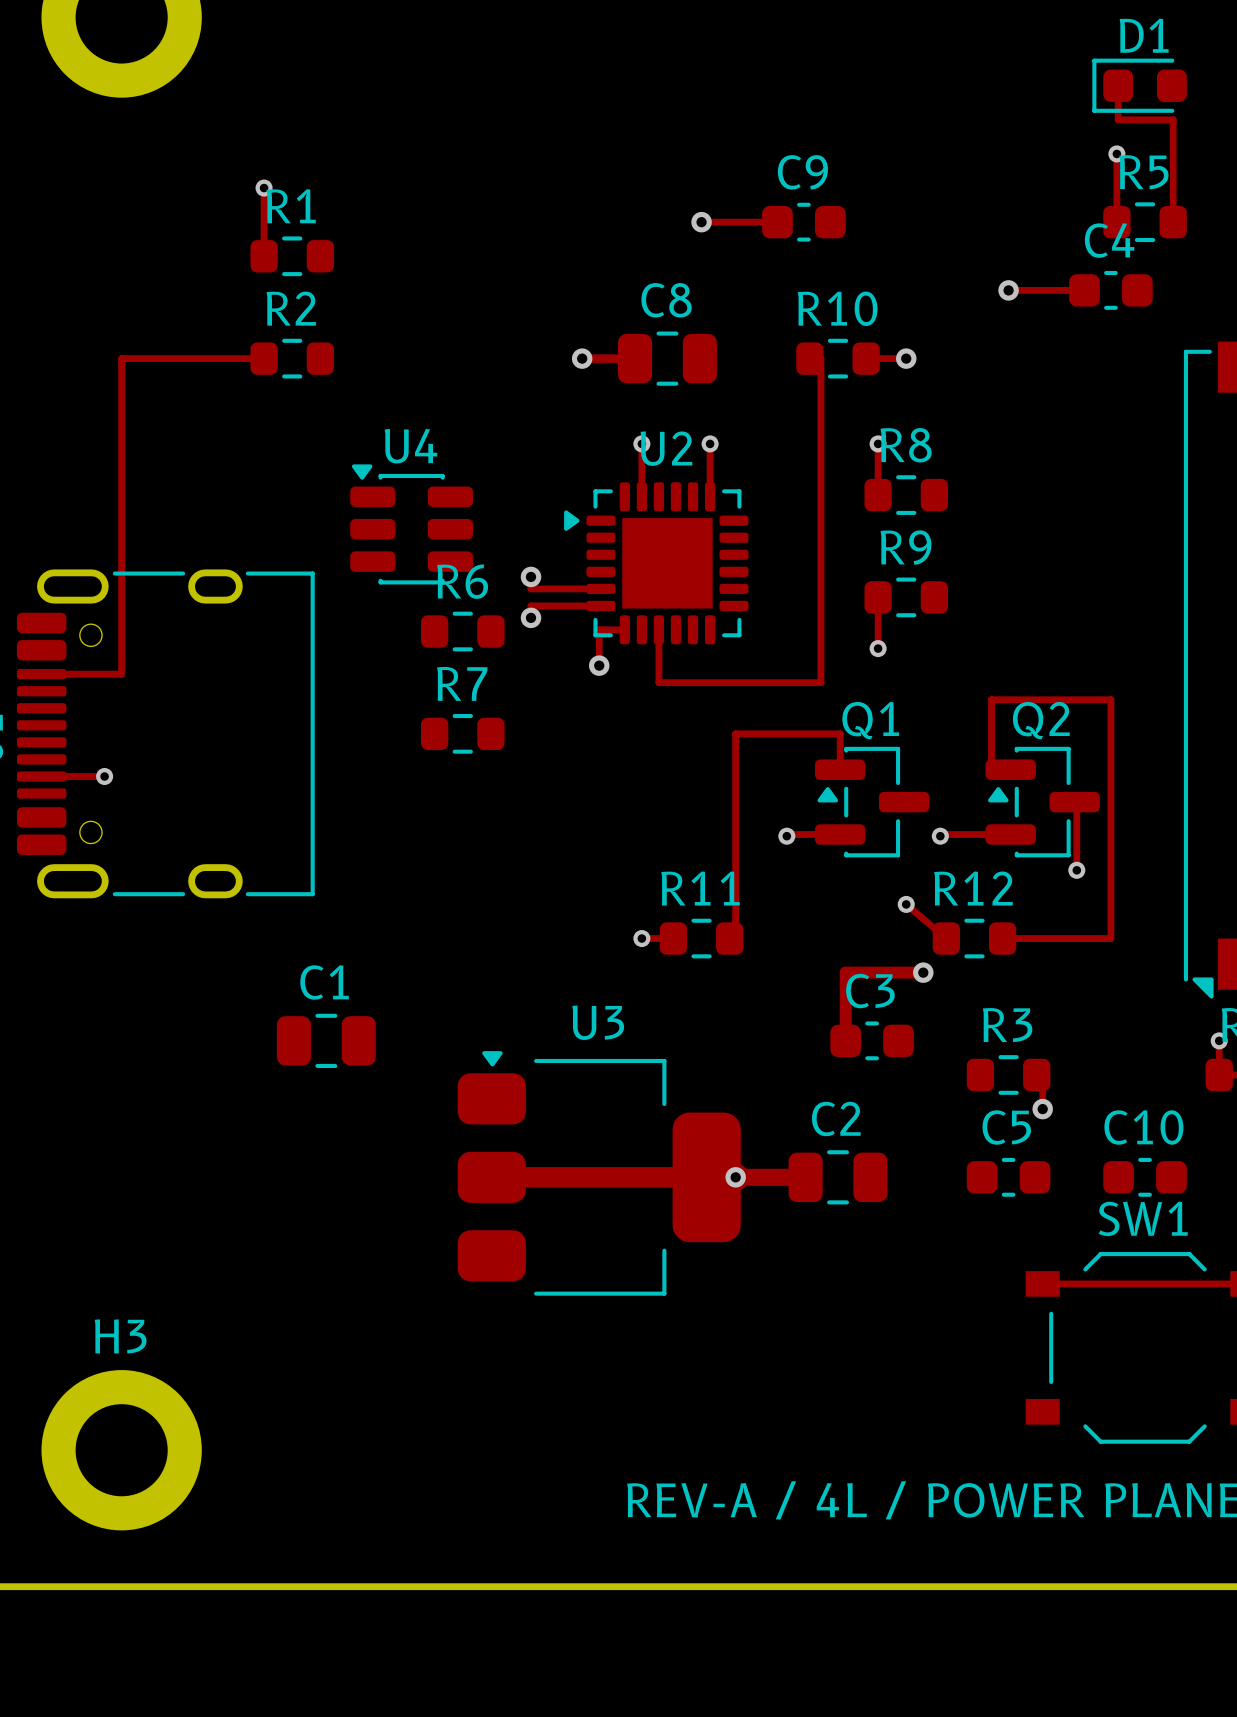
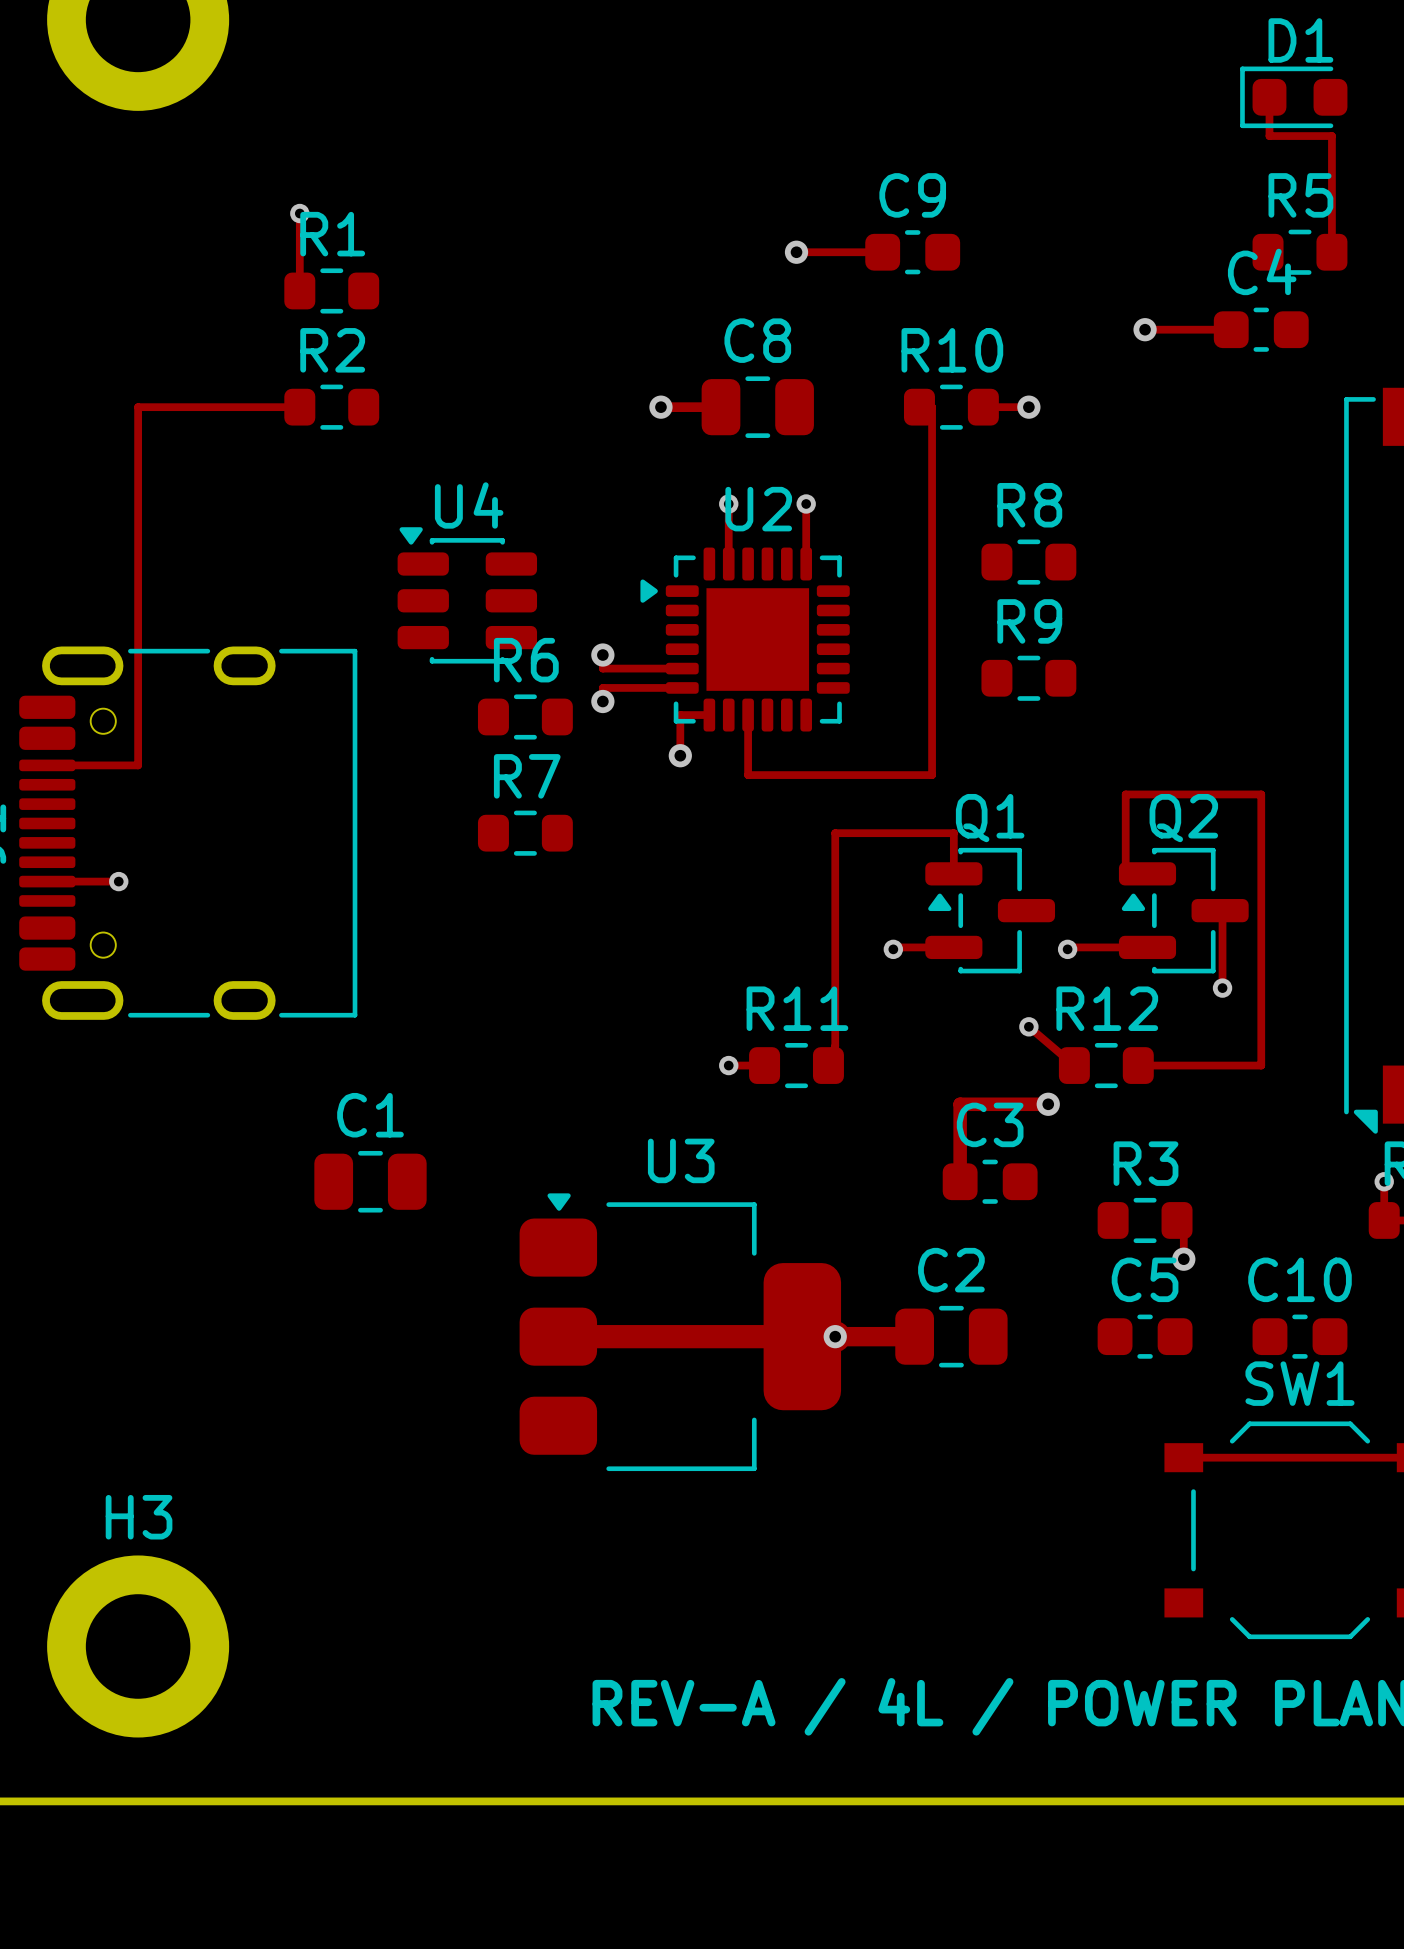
track: (1116, 153) (1116, 222) -> none
via: (1116, 153) -> none
track: (878, 443) (878, 495) -> none
via: (878, 443) -> none
track: (878, 597) (878, 648) -> none
via: (878, 648) -> none

